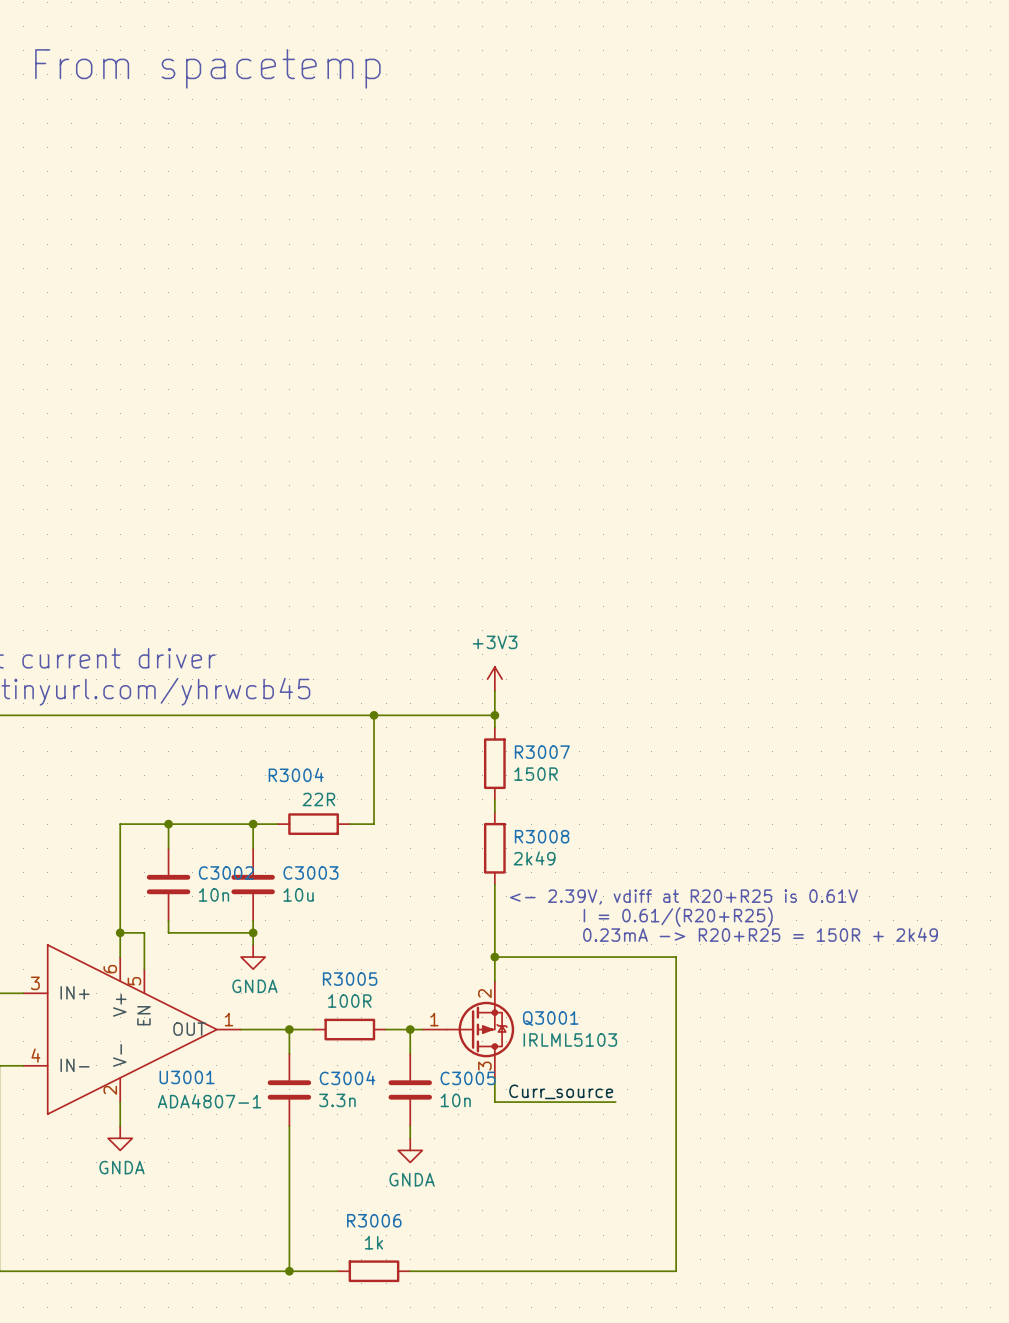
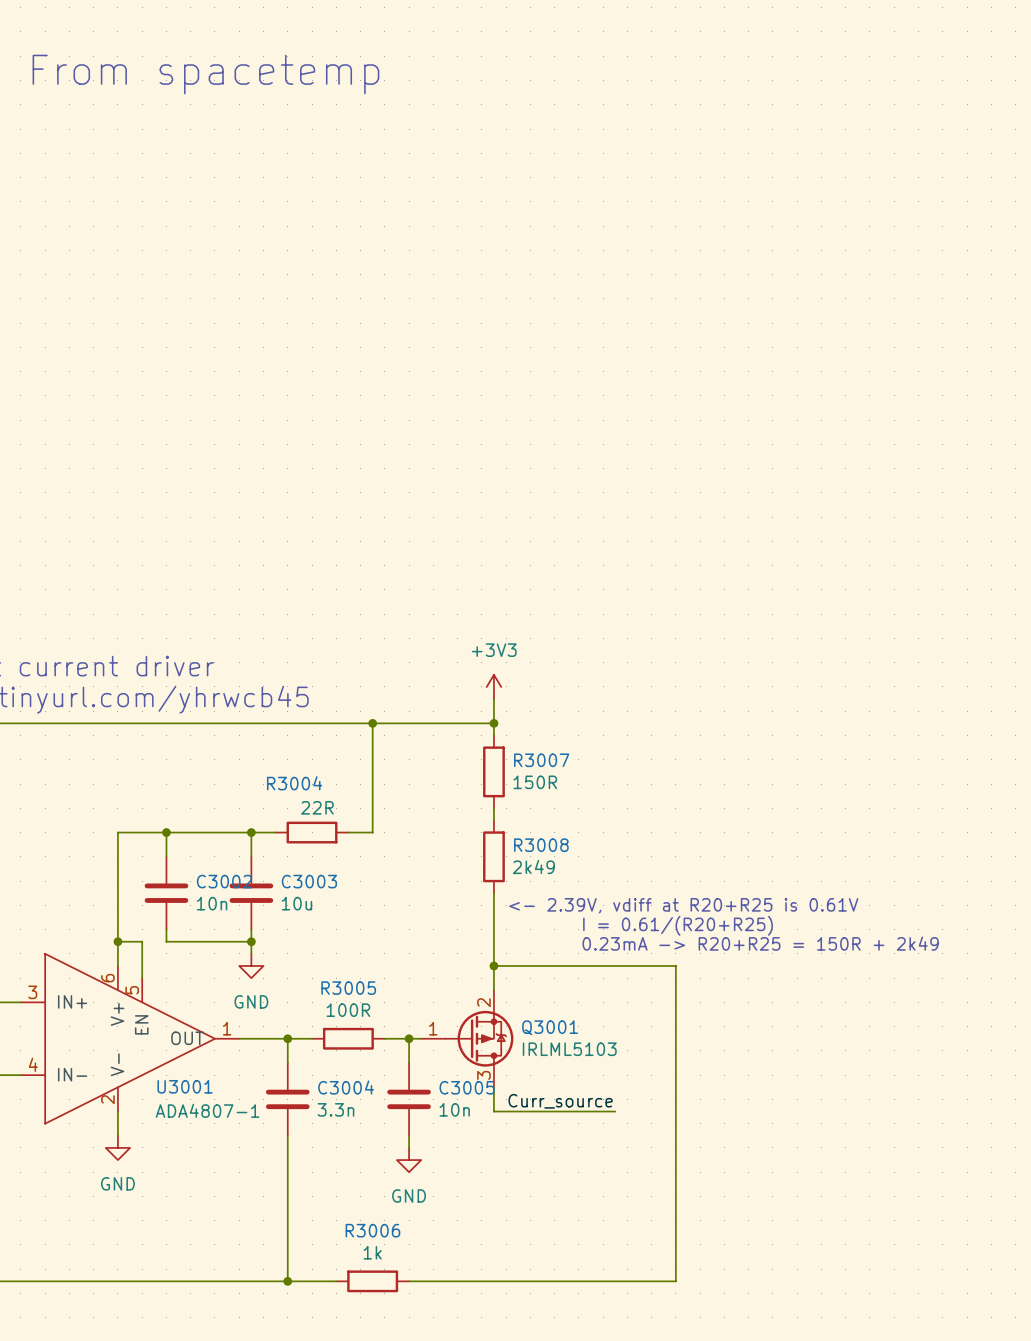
power symbol: GNDA (253, 957) -> GND (251, 965)
power symbol: GNDA (120, 1138) -> GND (117, 1147)
power symbol: GNDA (410, 1150) -> GND (409, 1160)

